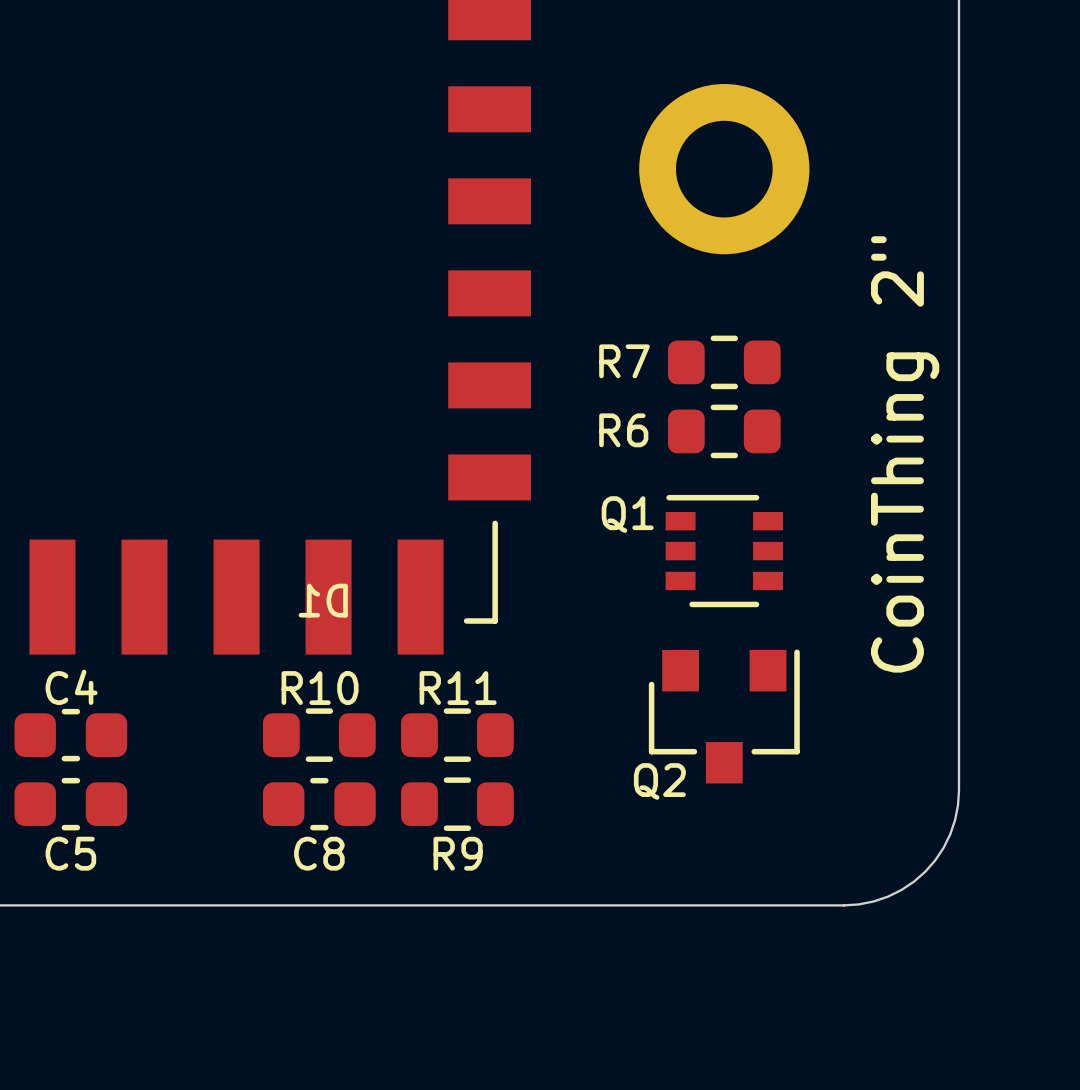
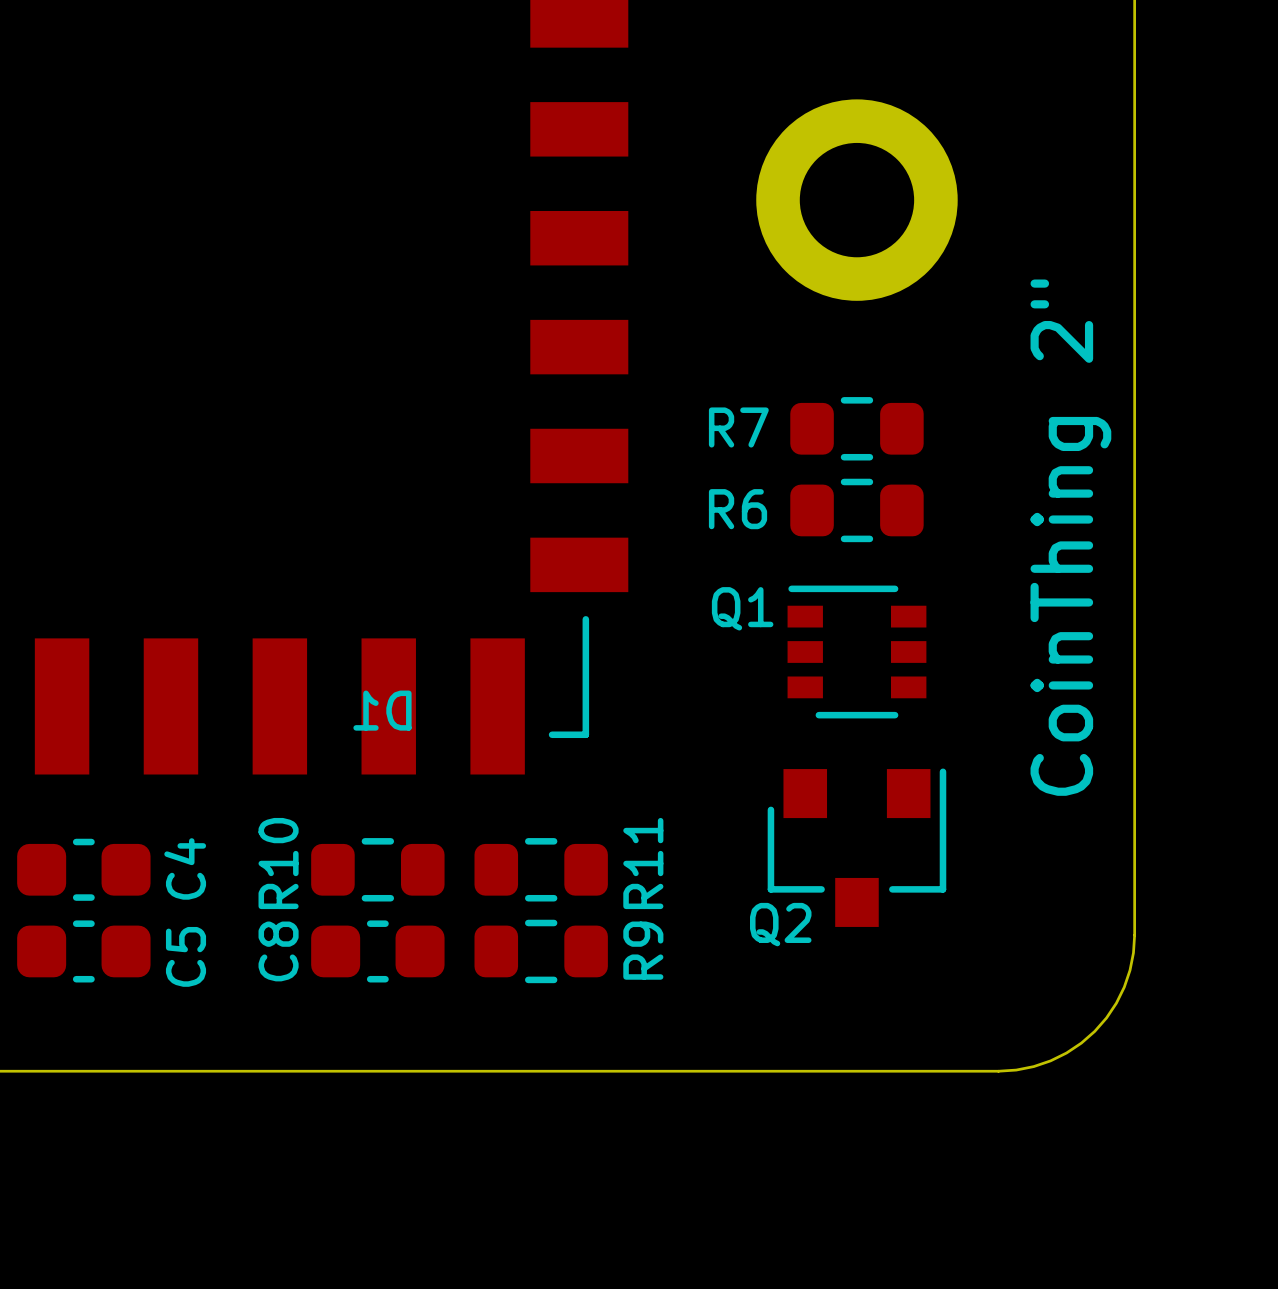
C4 name rotation: 0° (71, 687) -> 90° counterclockwise (185, 868)
C4 name position: C4 (71, 687) -> C4 (185, 868)
R10 name rotation: 0° (320, 688) -> 90° counterclockwise (278, 863)
R11 name rotation: 0° (458, 688) -> 90° counterclockwise (643, 863)
C5 name rotation: 0° (70, 853) -> 90° counterclockwise (186, 956)
C5 name position: C5 (70, 853) -> C5 (186, 956)
C8 name rotation: 0° (319, 853) -> 90° counterclockwise (278, 951)
C8 name position: C8 (319, 853) -> C8 (278, 951)
R9 name rotation: 0° (458, 853) -> 90° counterclockwise (643, 950)
R9 name position: R9 (458, 853) -> R9 (643, 950)

